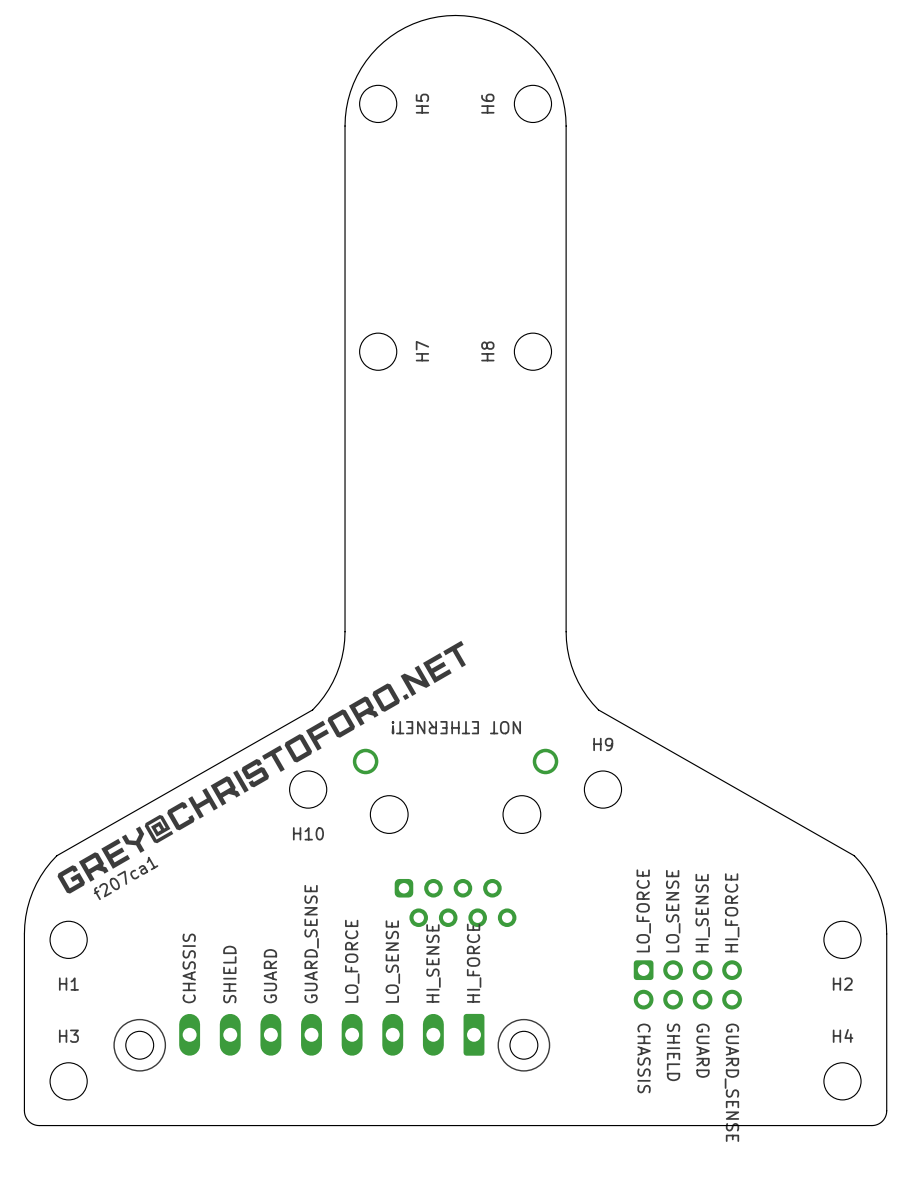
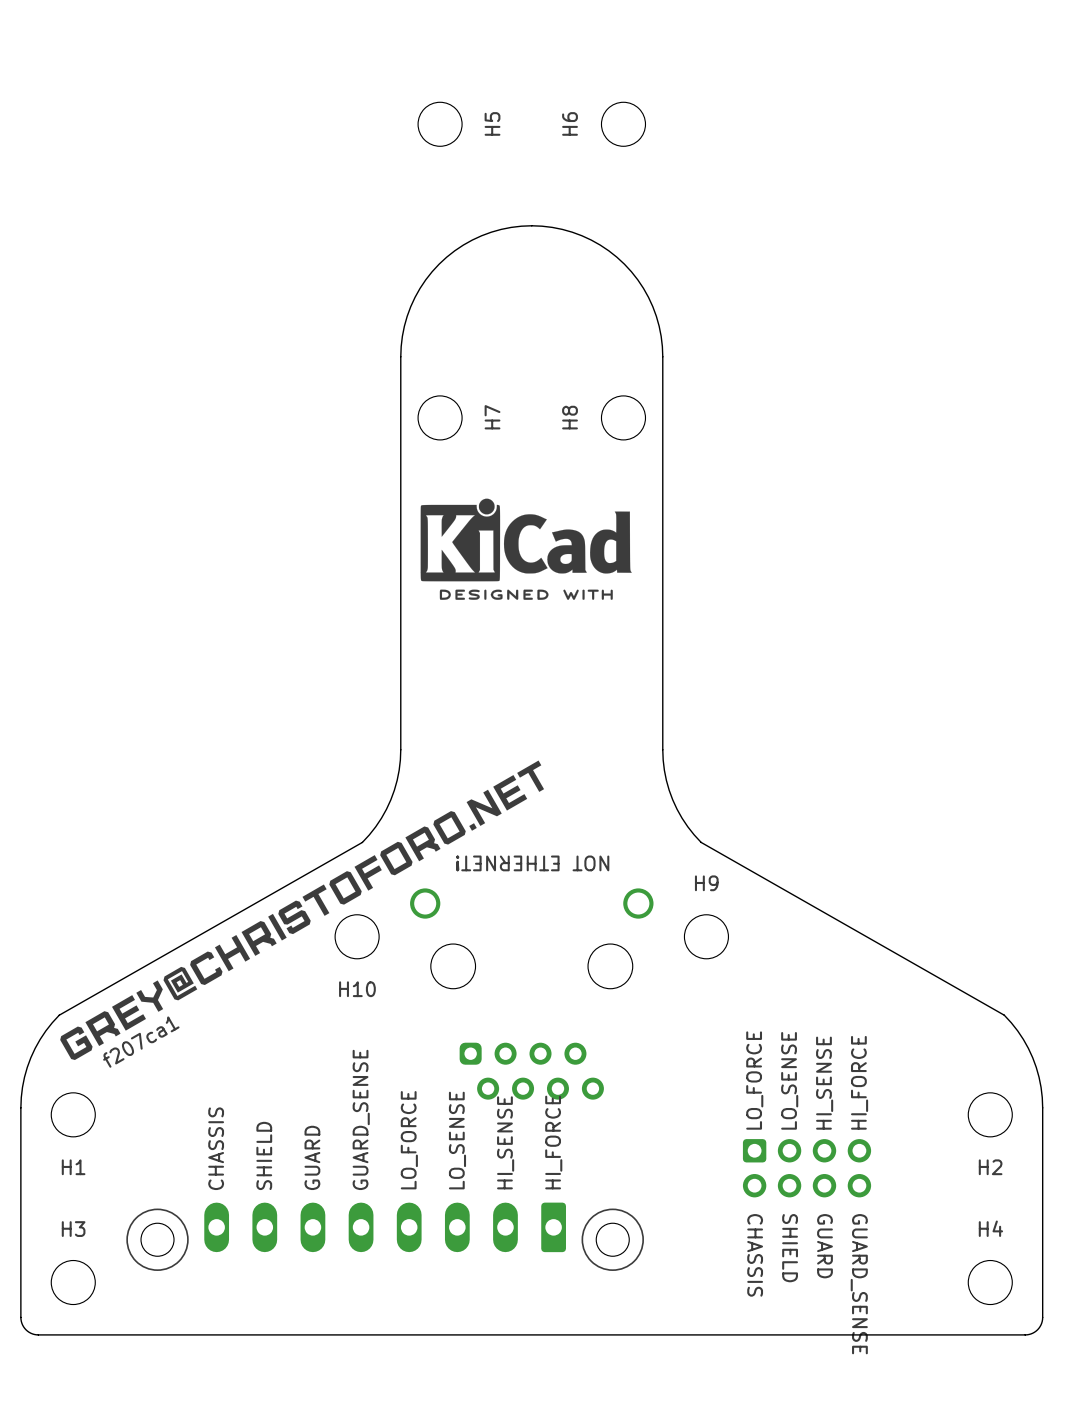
board edge: (345, 300) (345, 126) (348, 100) (353, 83) (366, 61) (390, 36) (421, 20) (455, 15) (481, 18) (513, 31) (539, 54) (557, 83) (564, 108) (566, 126) (566, 300) -> (400, 356) (402, 336) (410, 306) (420, 288) (439, 264) (454, 250) (481, 235) (501, 229) (531, 225) (552, 227) (581, 235) (608, 250) (624, 264) (637, 279) (652, 306) (659, 326) (662, 356)
drawing: none -> [420, 498, 632, 600]

